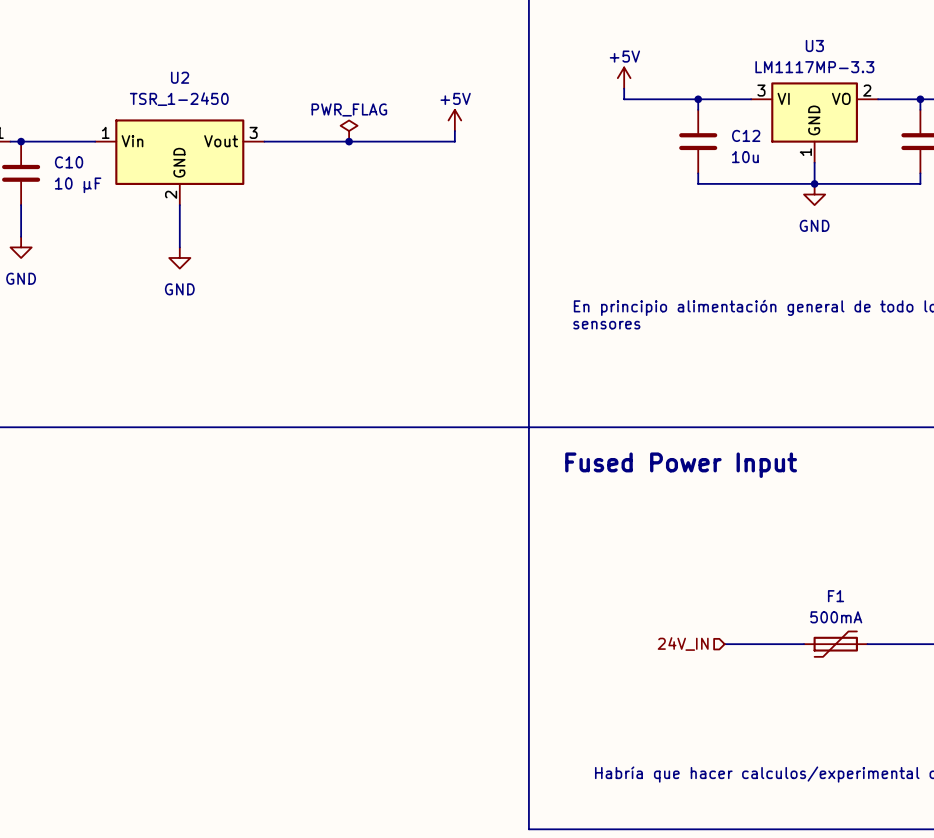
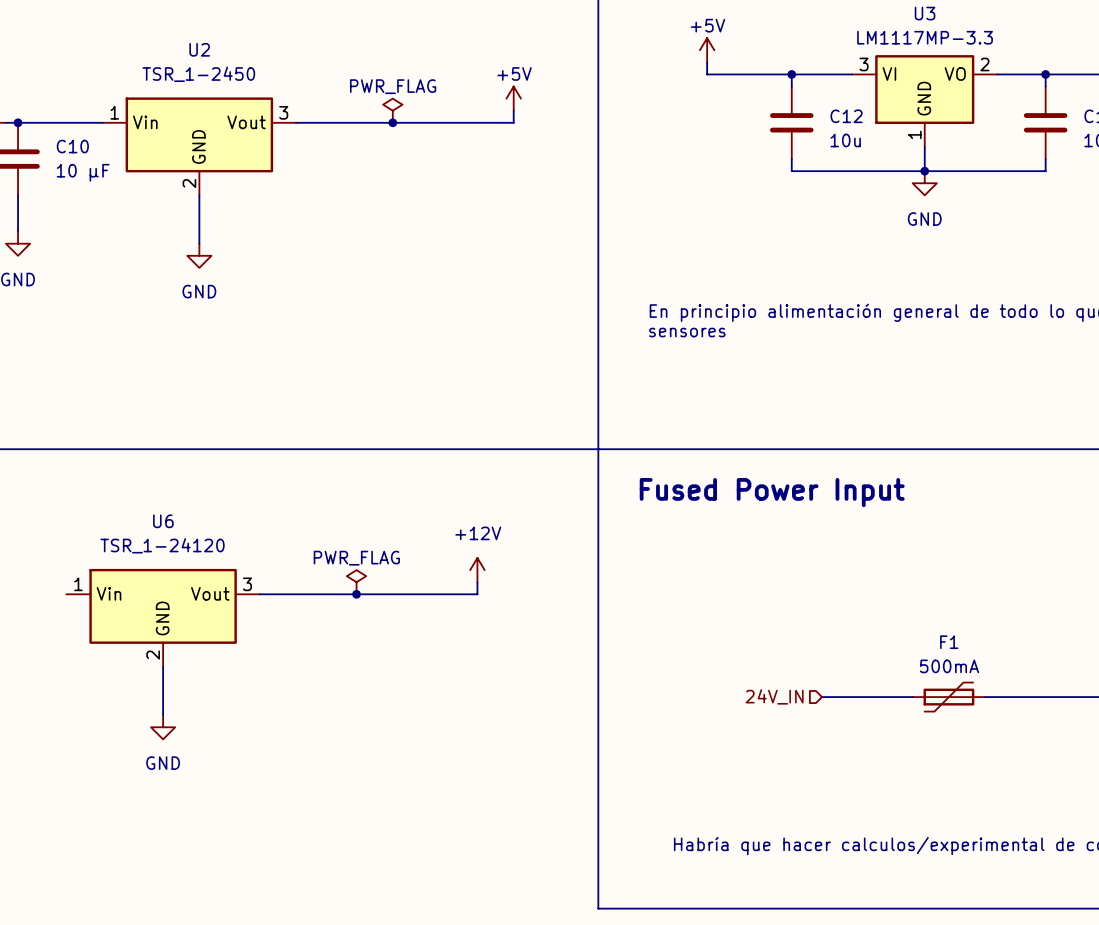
power symbol: none -> +12V (477, 570)
power symbol: none -> PWR_FLAG (356, 582)
wire: none -> (477, 582) (477, 594) (259, 594)
junction: none -> (356, 594)
U6: none -> TSR_1-24120 (163, 617)
wire: none -> (163, 666) (163, 715)
power symbol: none -> GND (163, 727)

